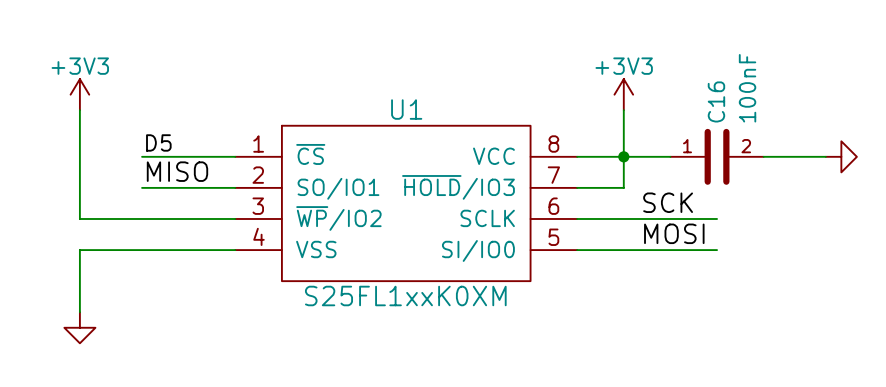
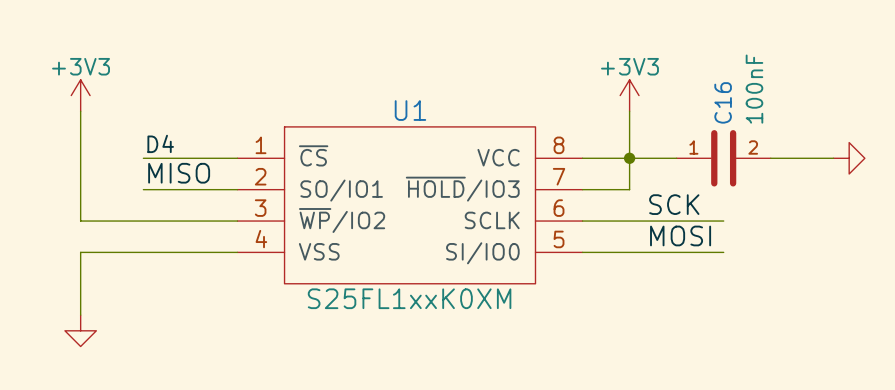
label: D5 (158, 142) -> D4 (160, 143)

